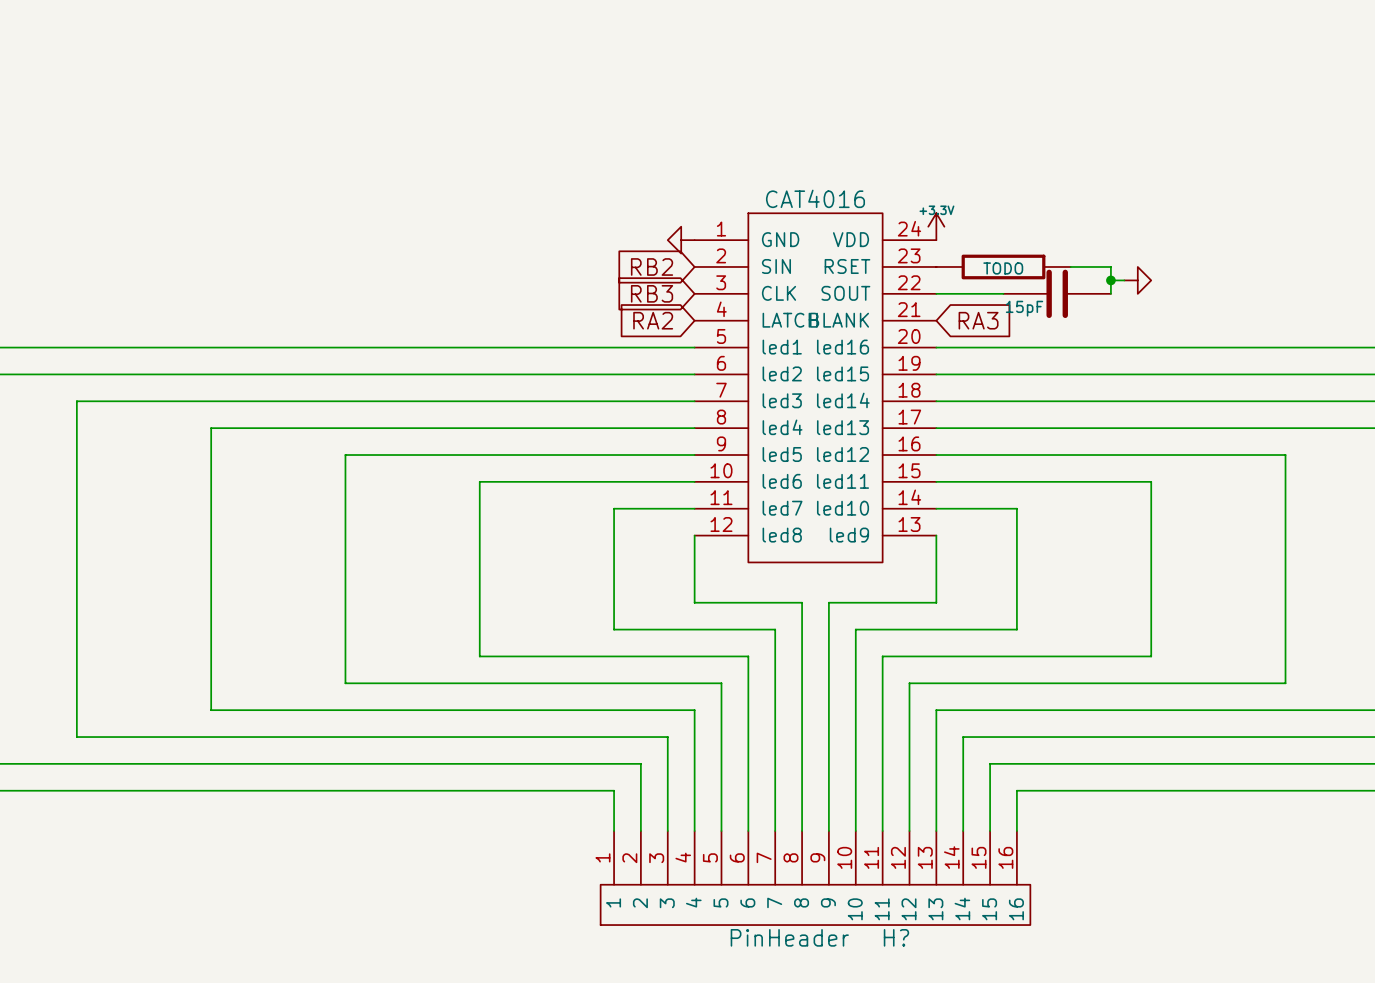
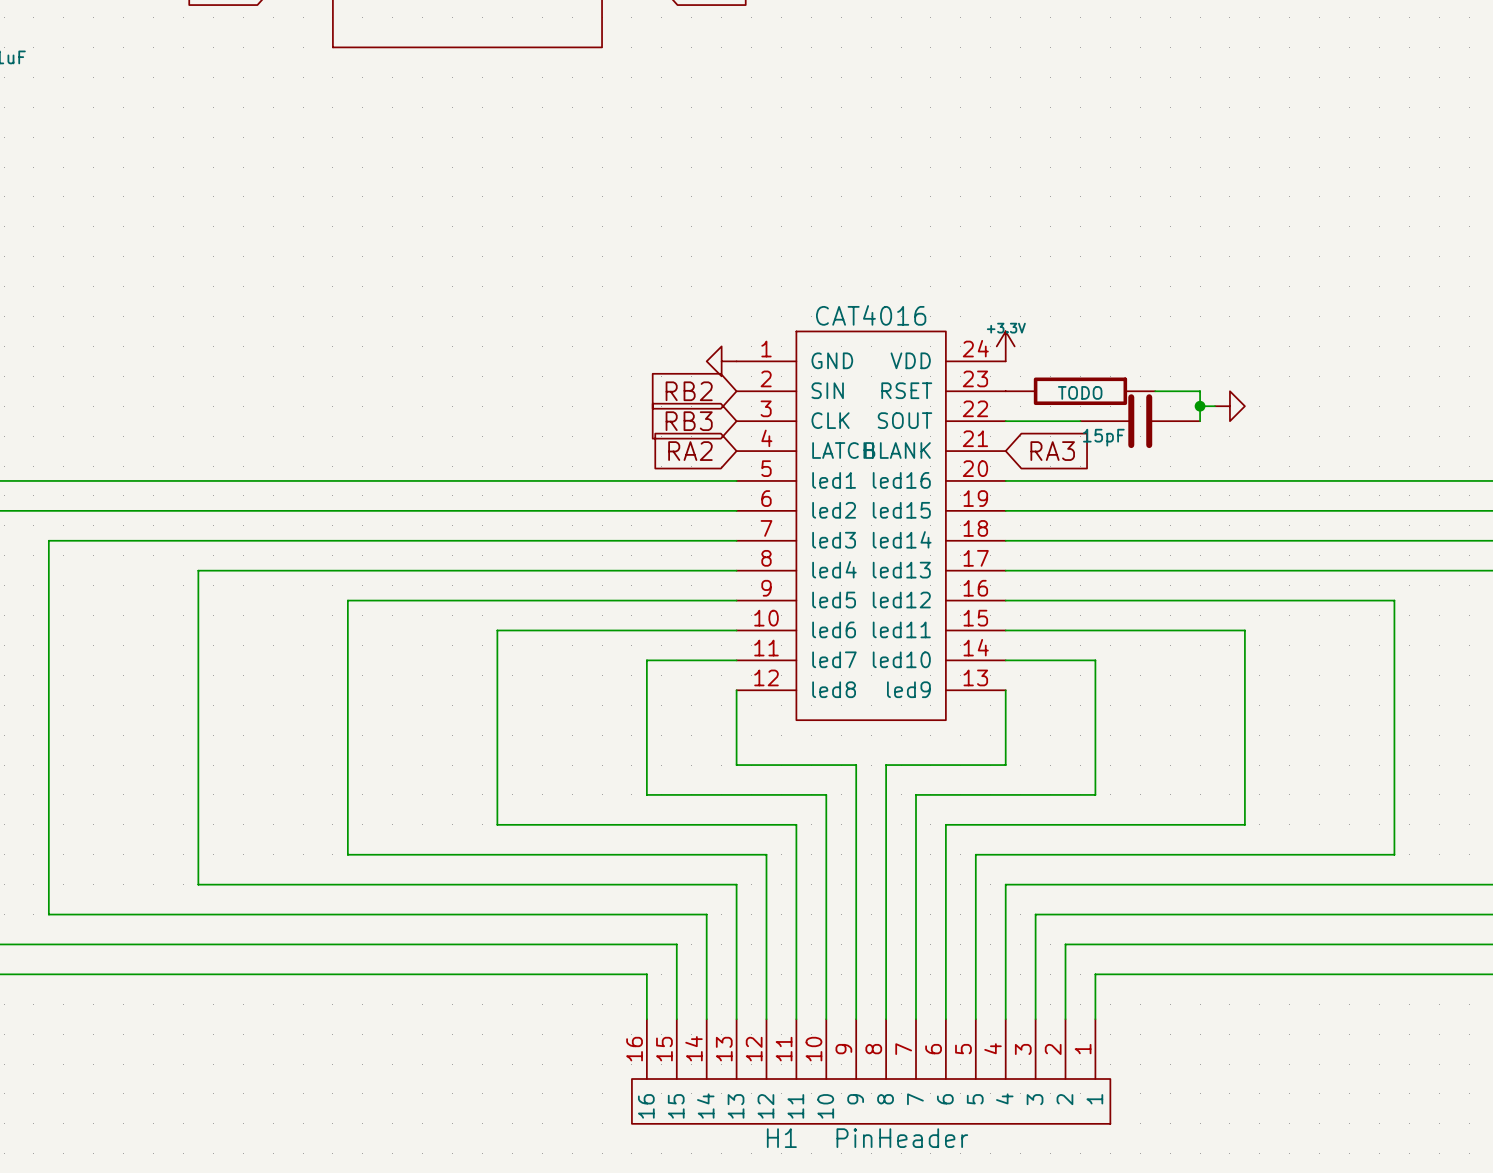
H? flip: as is (815, 904) -> left-right (871, 1101)
H? name: H? (896, 937) -> H1 (781, 1138)

